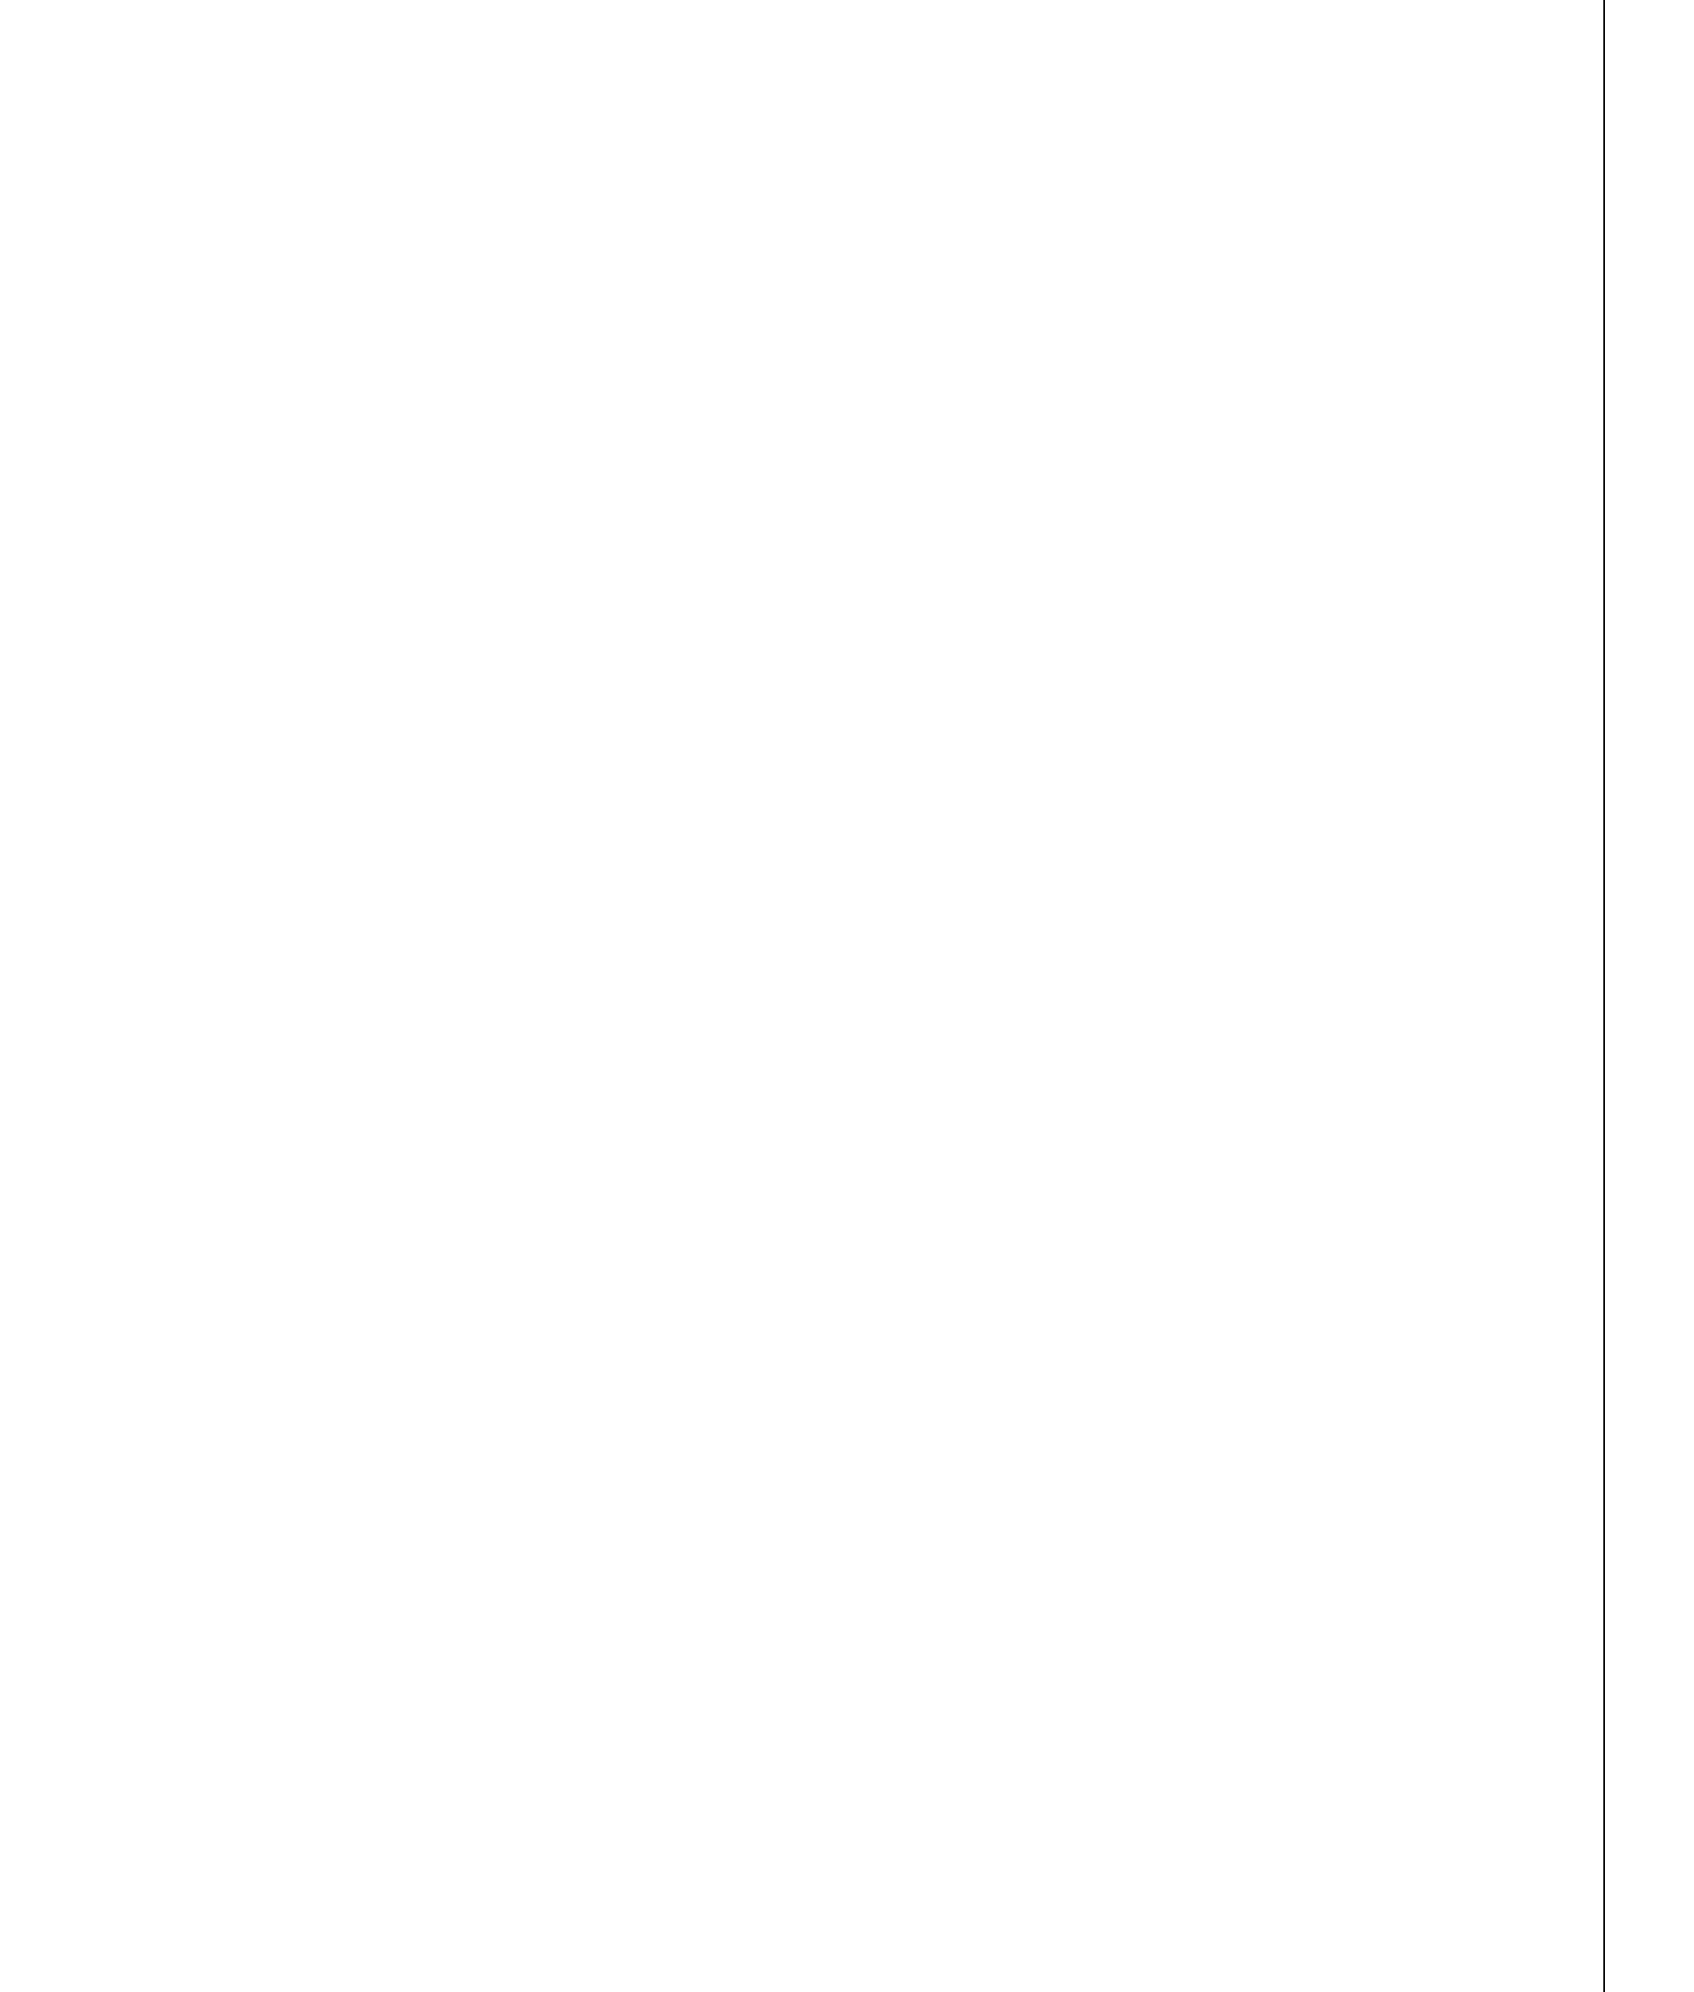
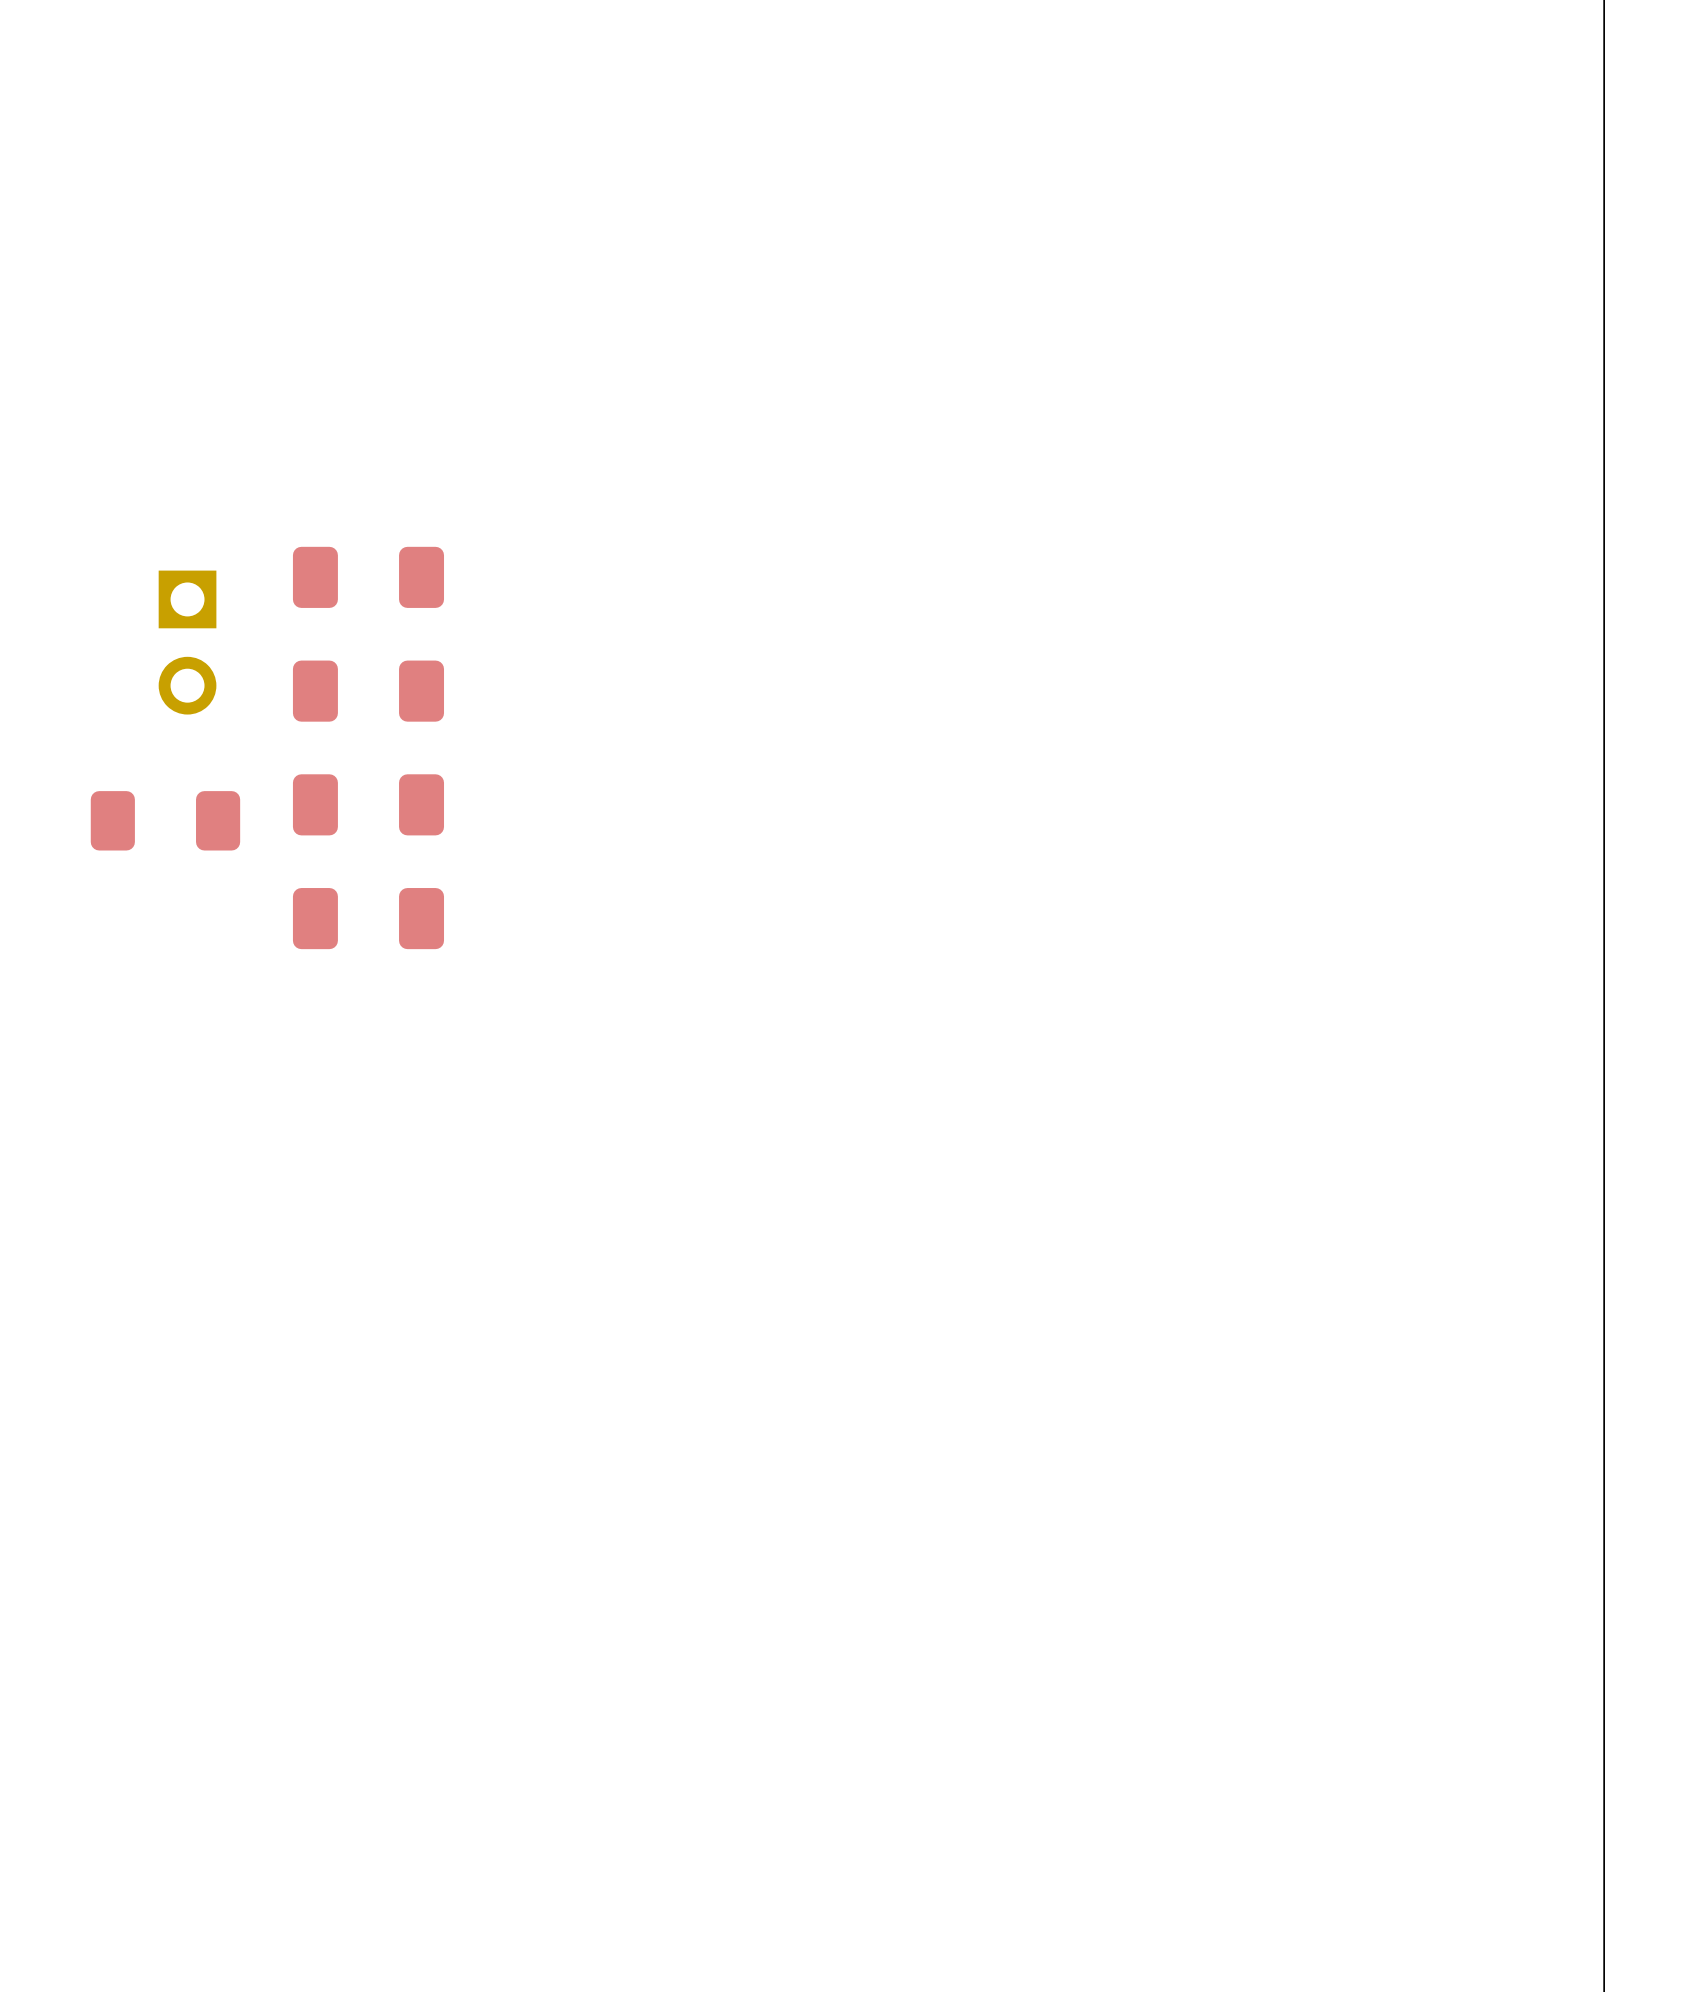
part: none -> (368, 577)
part: none -> (187, 642)
part: none -> (368, 691)
part: none -> (368, 804)
part: none -> (165, 820)
part: none -> (368, 918)

